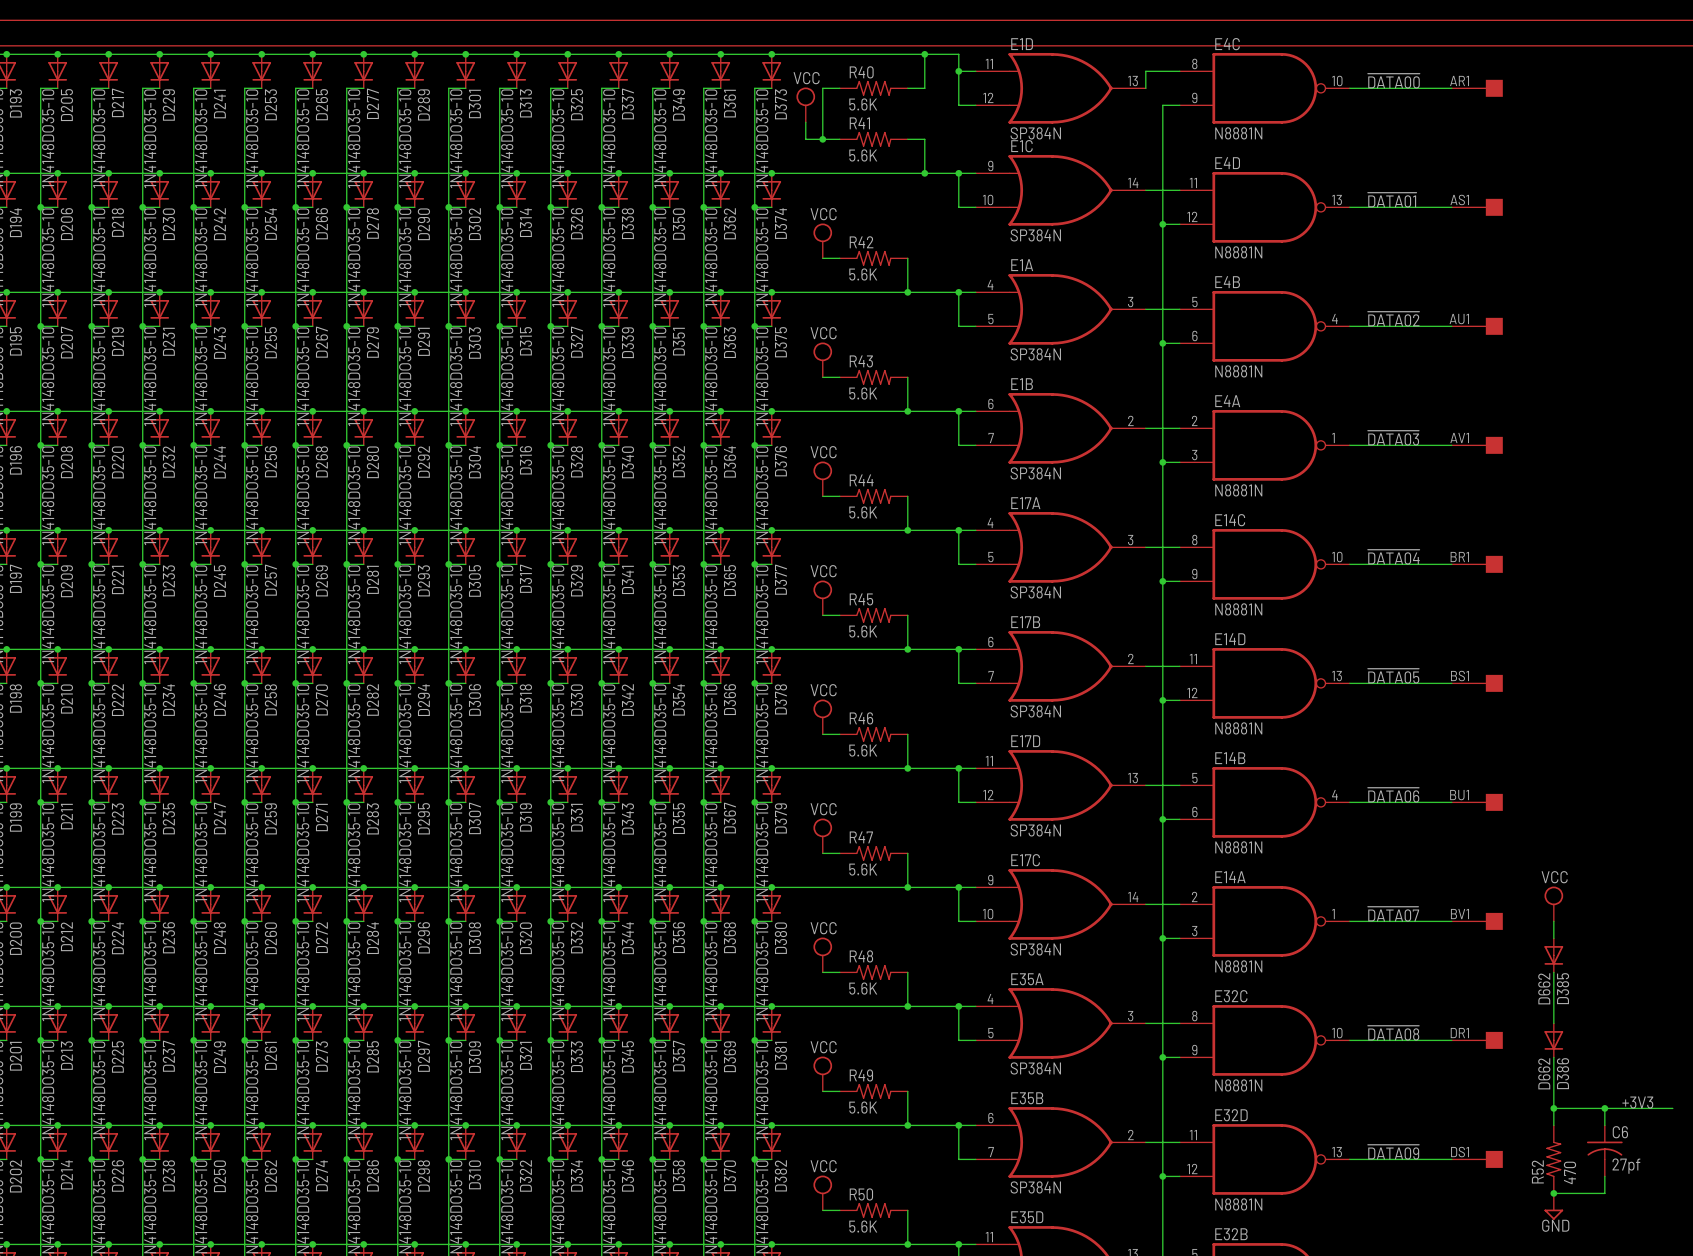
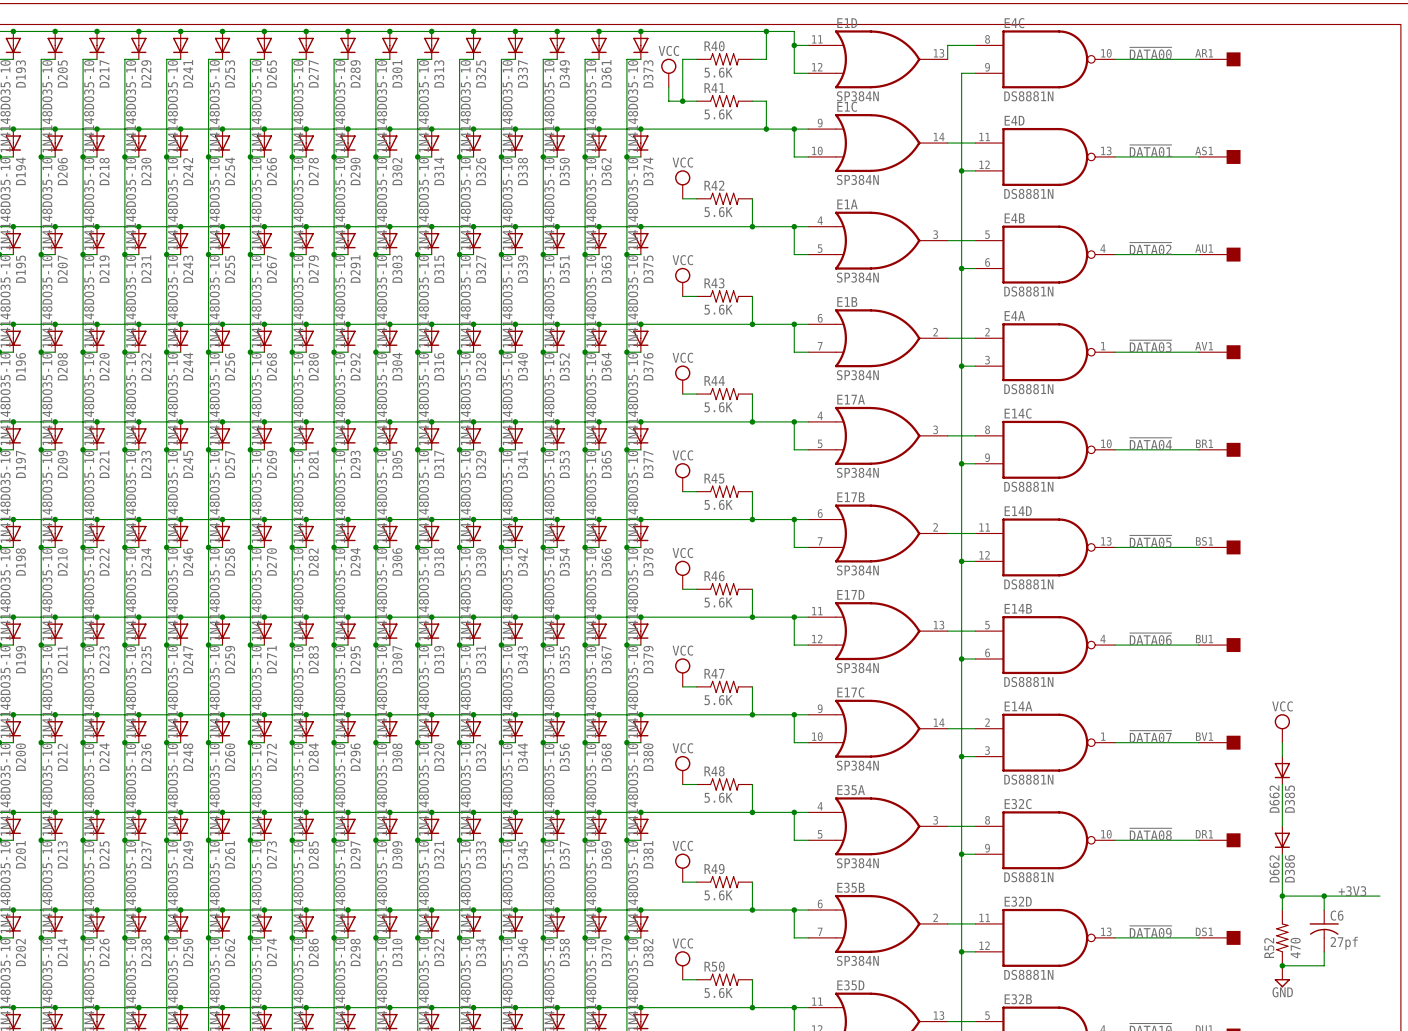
E4C value: N8881N (1238, 133) -> DS8881N (1028, 96)
E4D value: N8881N (1238, 252) -> DS8881N (1028, 193)
E4B value: N8881N (1238, 371) -> DS8881N (1028, 291)
E4A value: N8881N (1238, 490) -> DS8881N (1028, 389)
E14C value: N8881N (1238, 609) -> DS8881N (1028, 486)
E14D value: N8881N (1238, 728) -> DS8881N (1028, 584)
E14B value: N8881N (1238, 847) -> DS8881N (1028, 682)
E14A value: N8881N (1238, 966) -> DS8881N (1028, 779)
E32C value: N8881N (1238, 1085) -> DS8881N (1028, 877)
E32D value: N8881N (1238, 1204) -> DS8881N (1028, 974)

